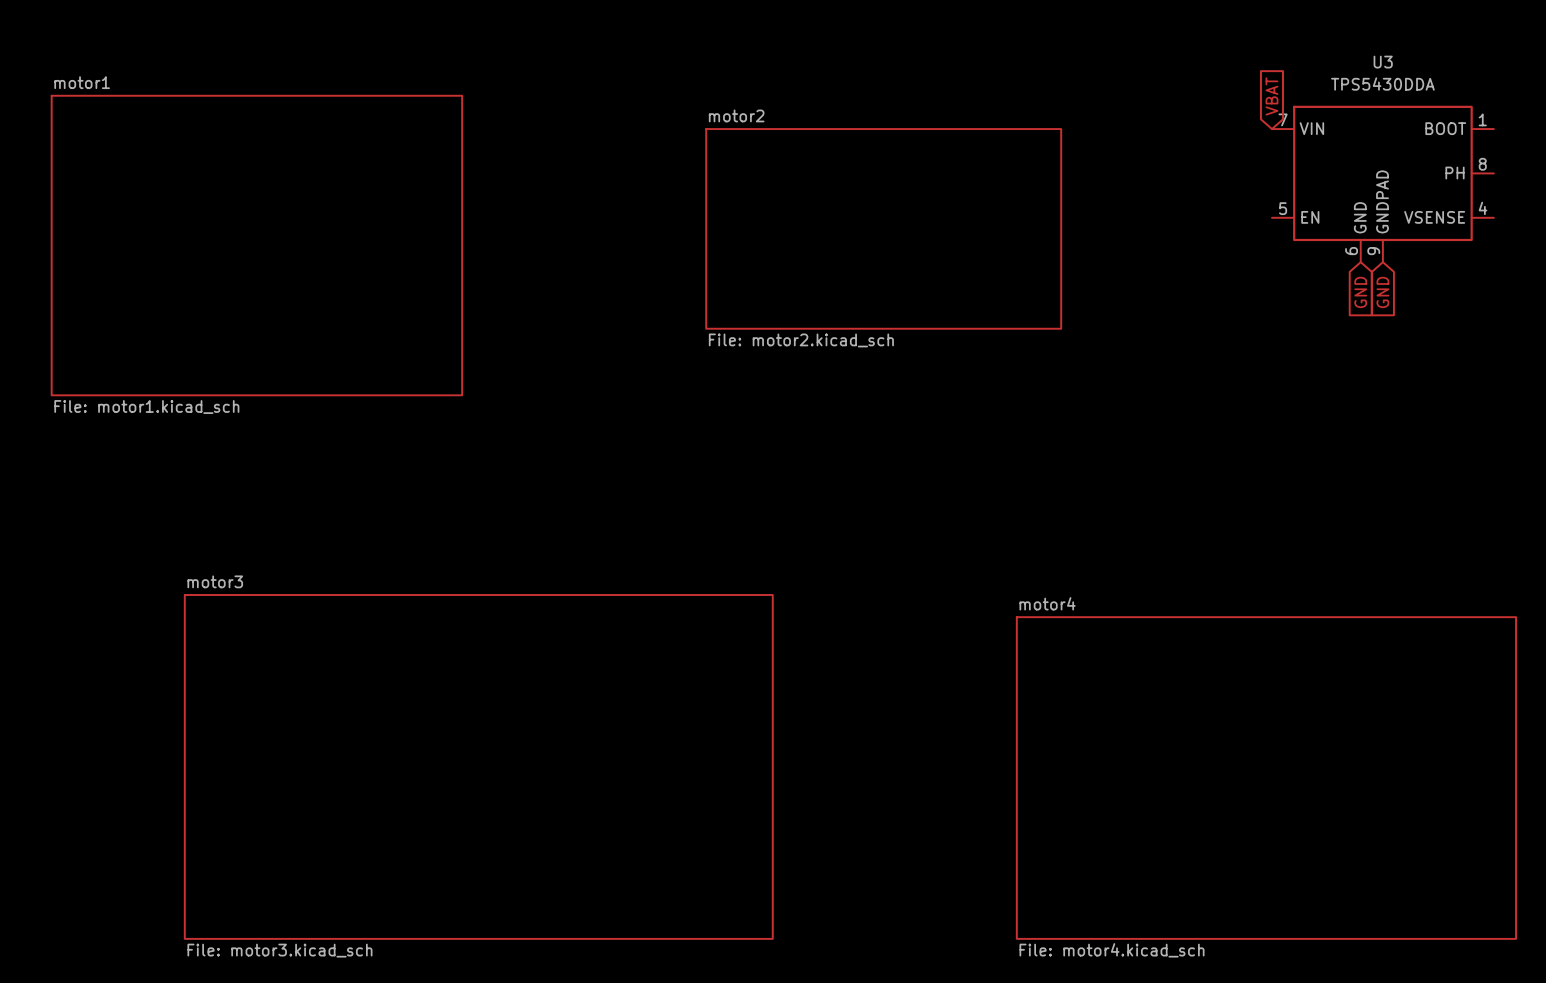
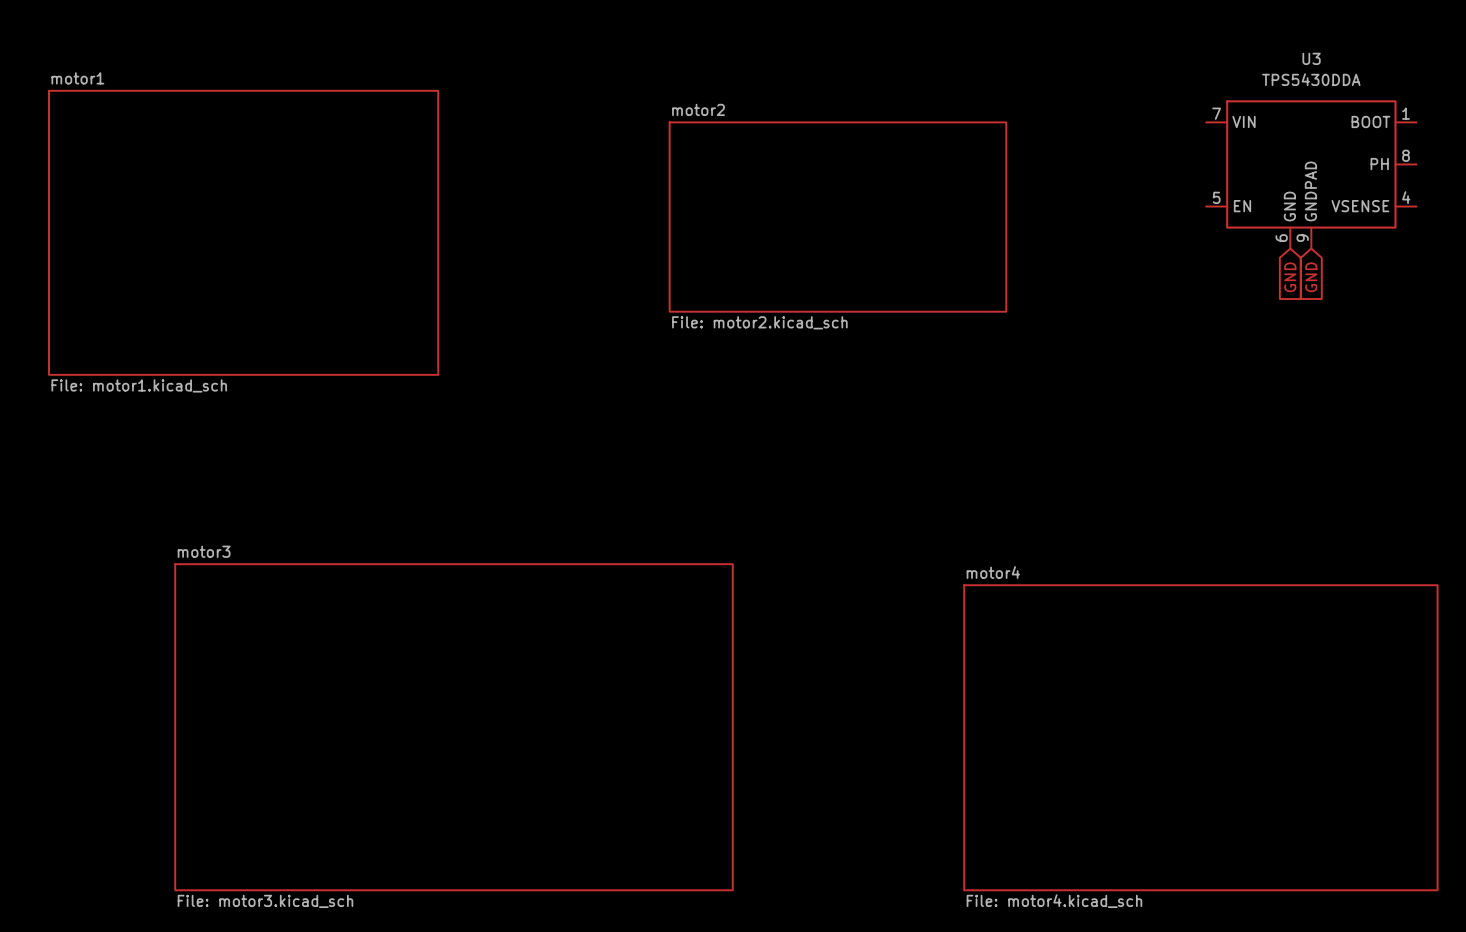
global label: VBAT (1271, 96) -> none

